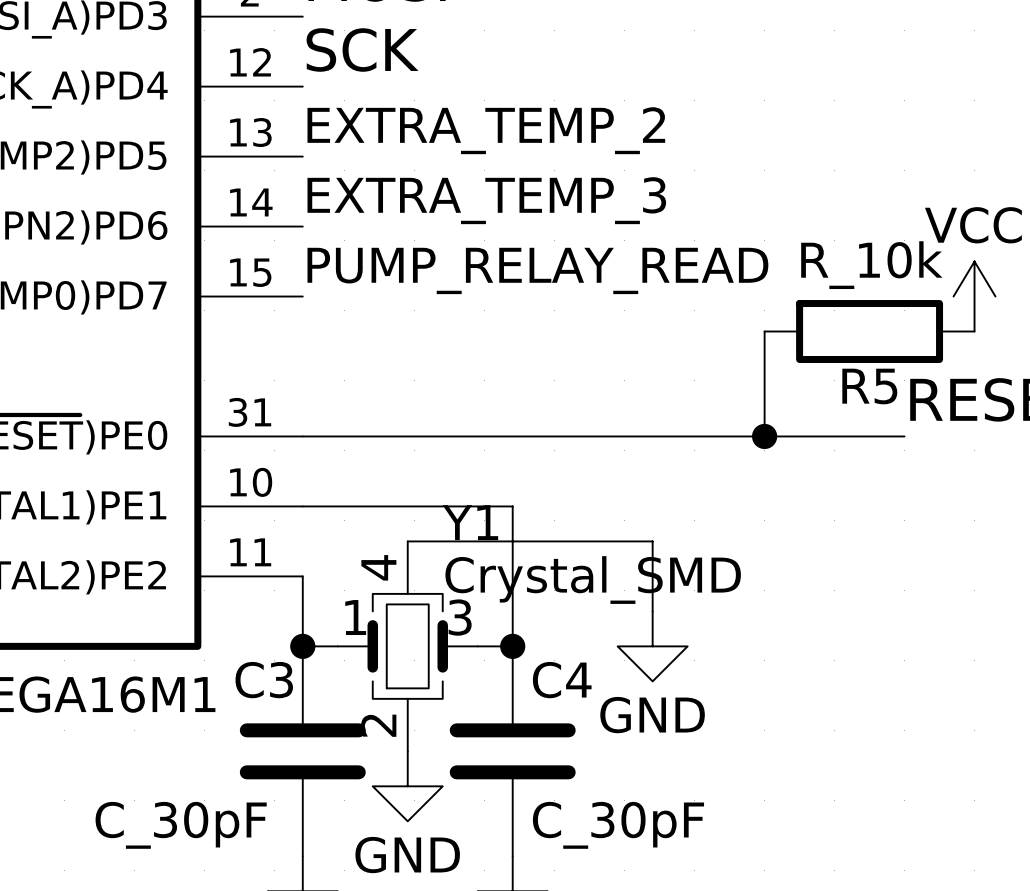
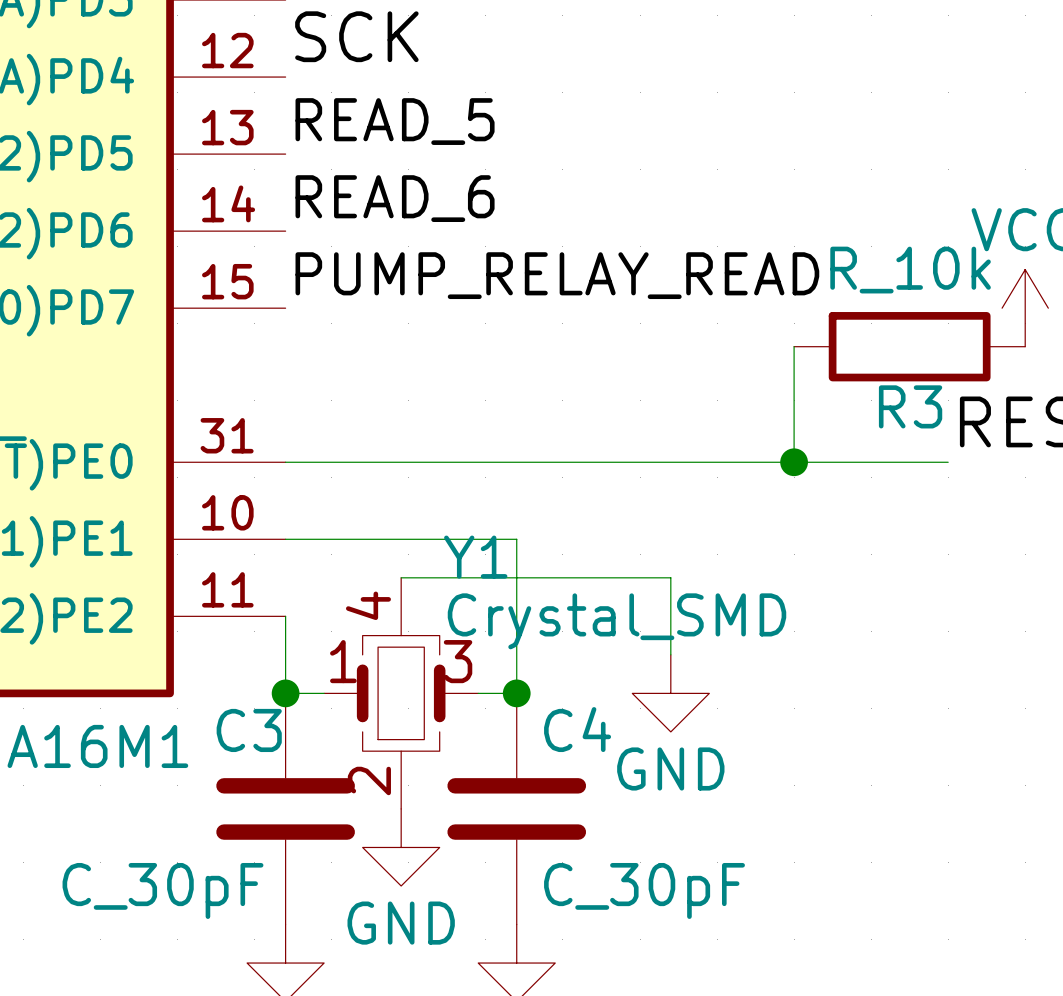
label: EXTRA_TEMP_2 (486, 130) -> READ_5 (395, 121)
label: EXTRA_TEMP_3 (486, 200) -> READ_6 (395, 198)
R5 name: R5 (869, 386) -> R3 (910, 406)

